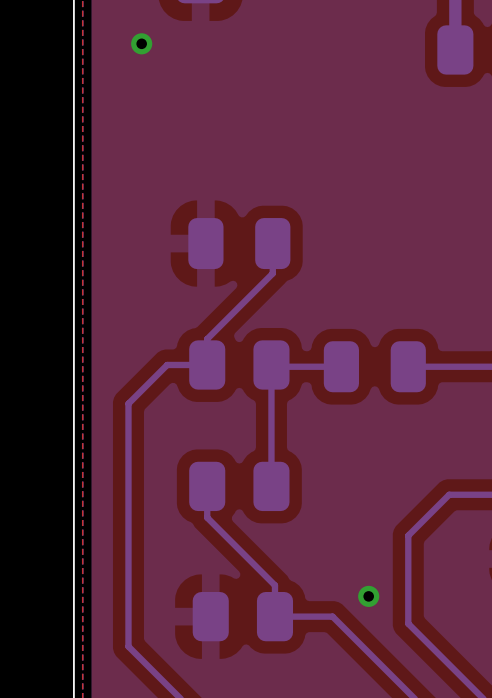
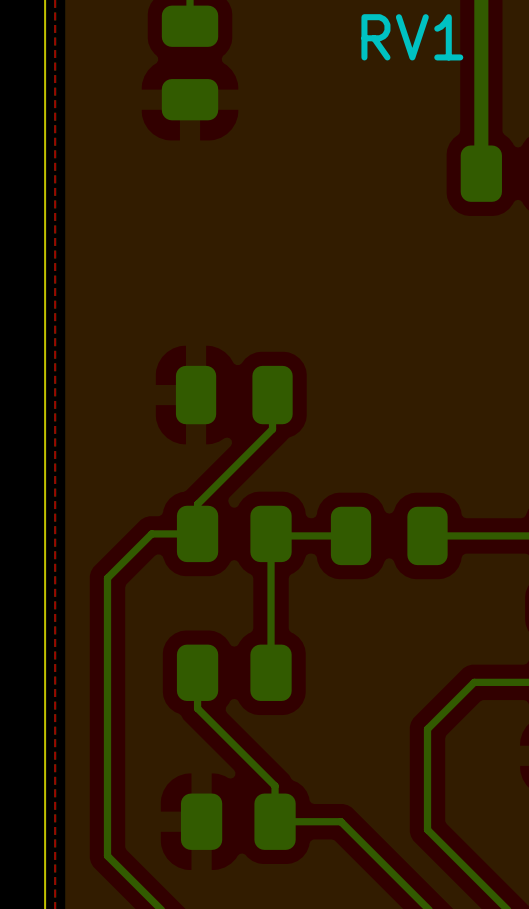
via: (141, 43) -> none
via: (368, 596) -> none

